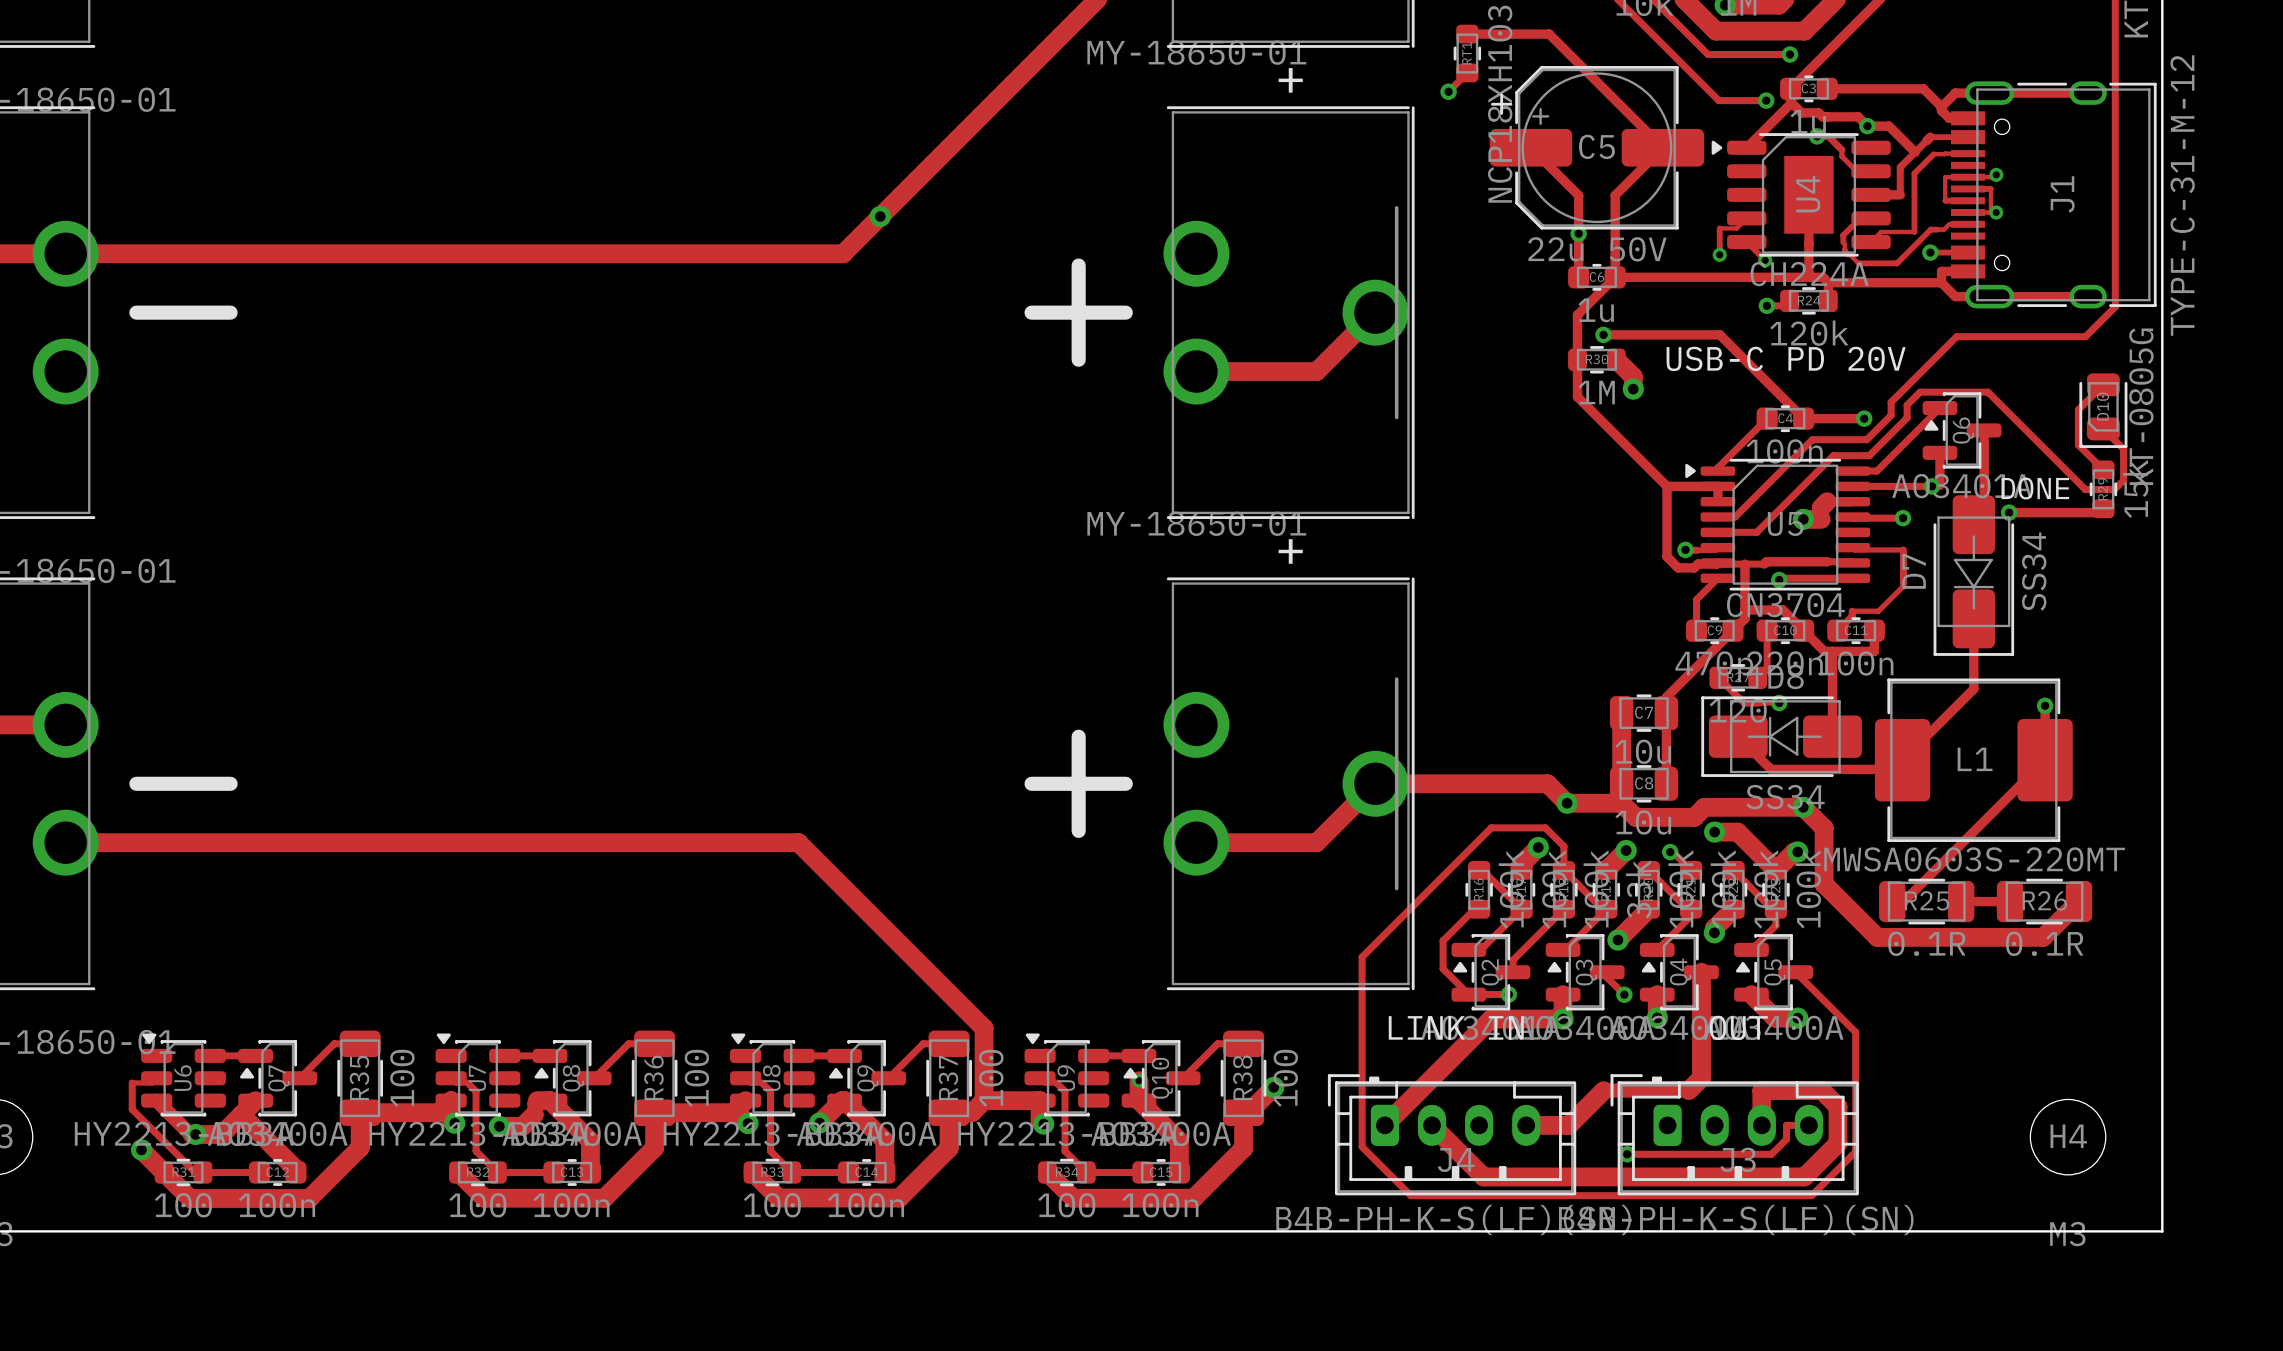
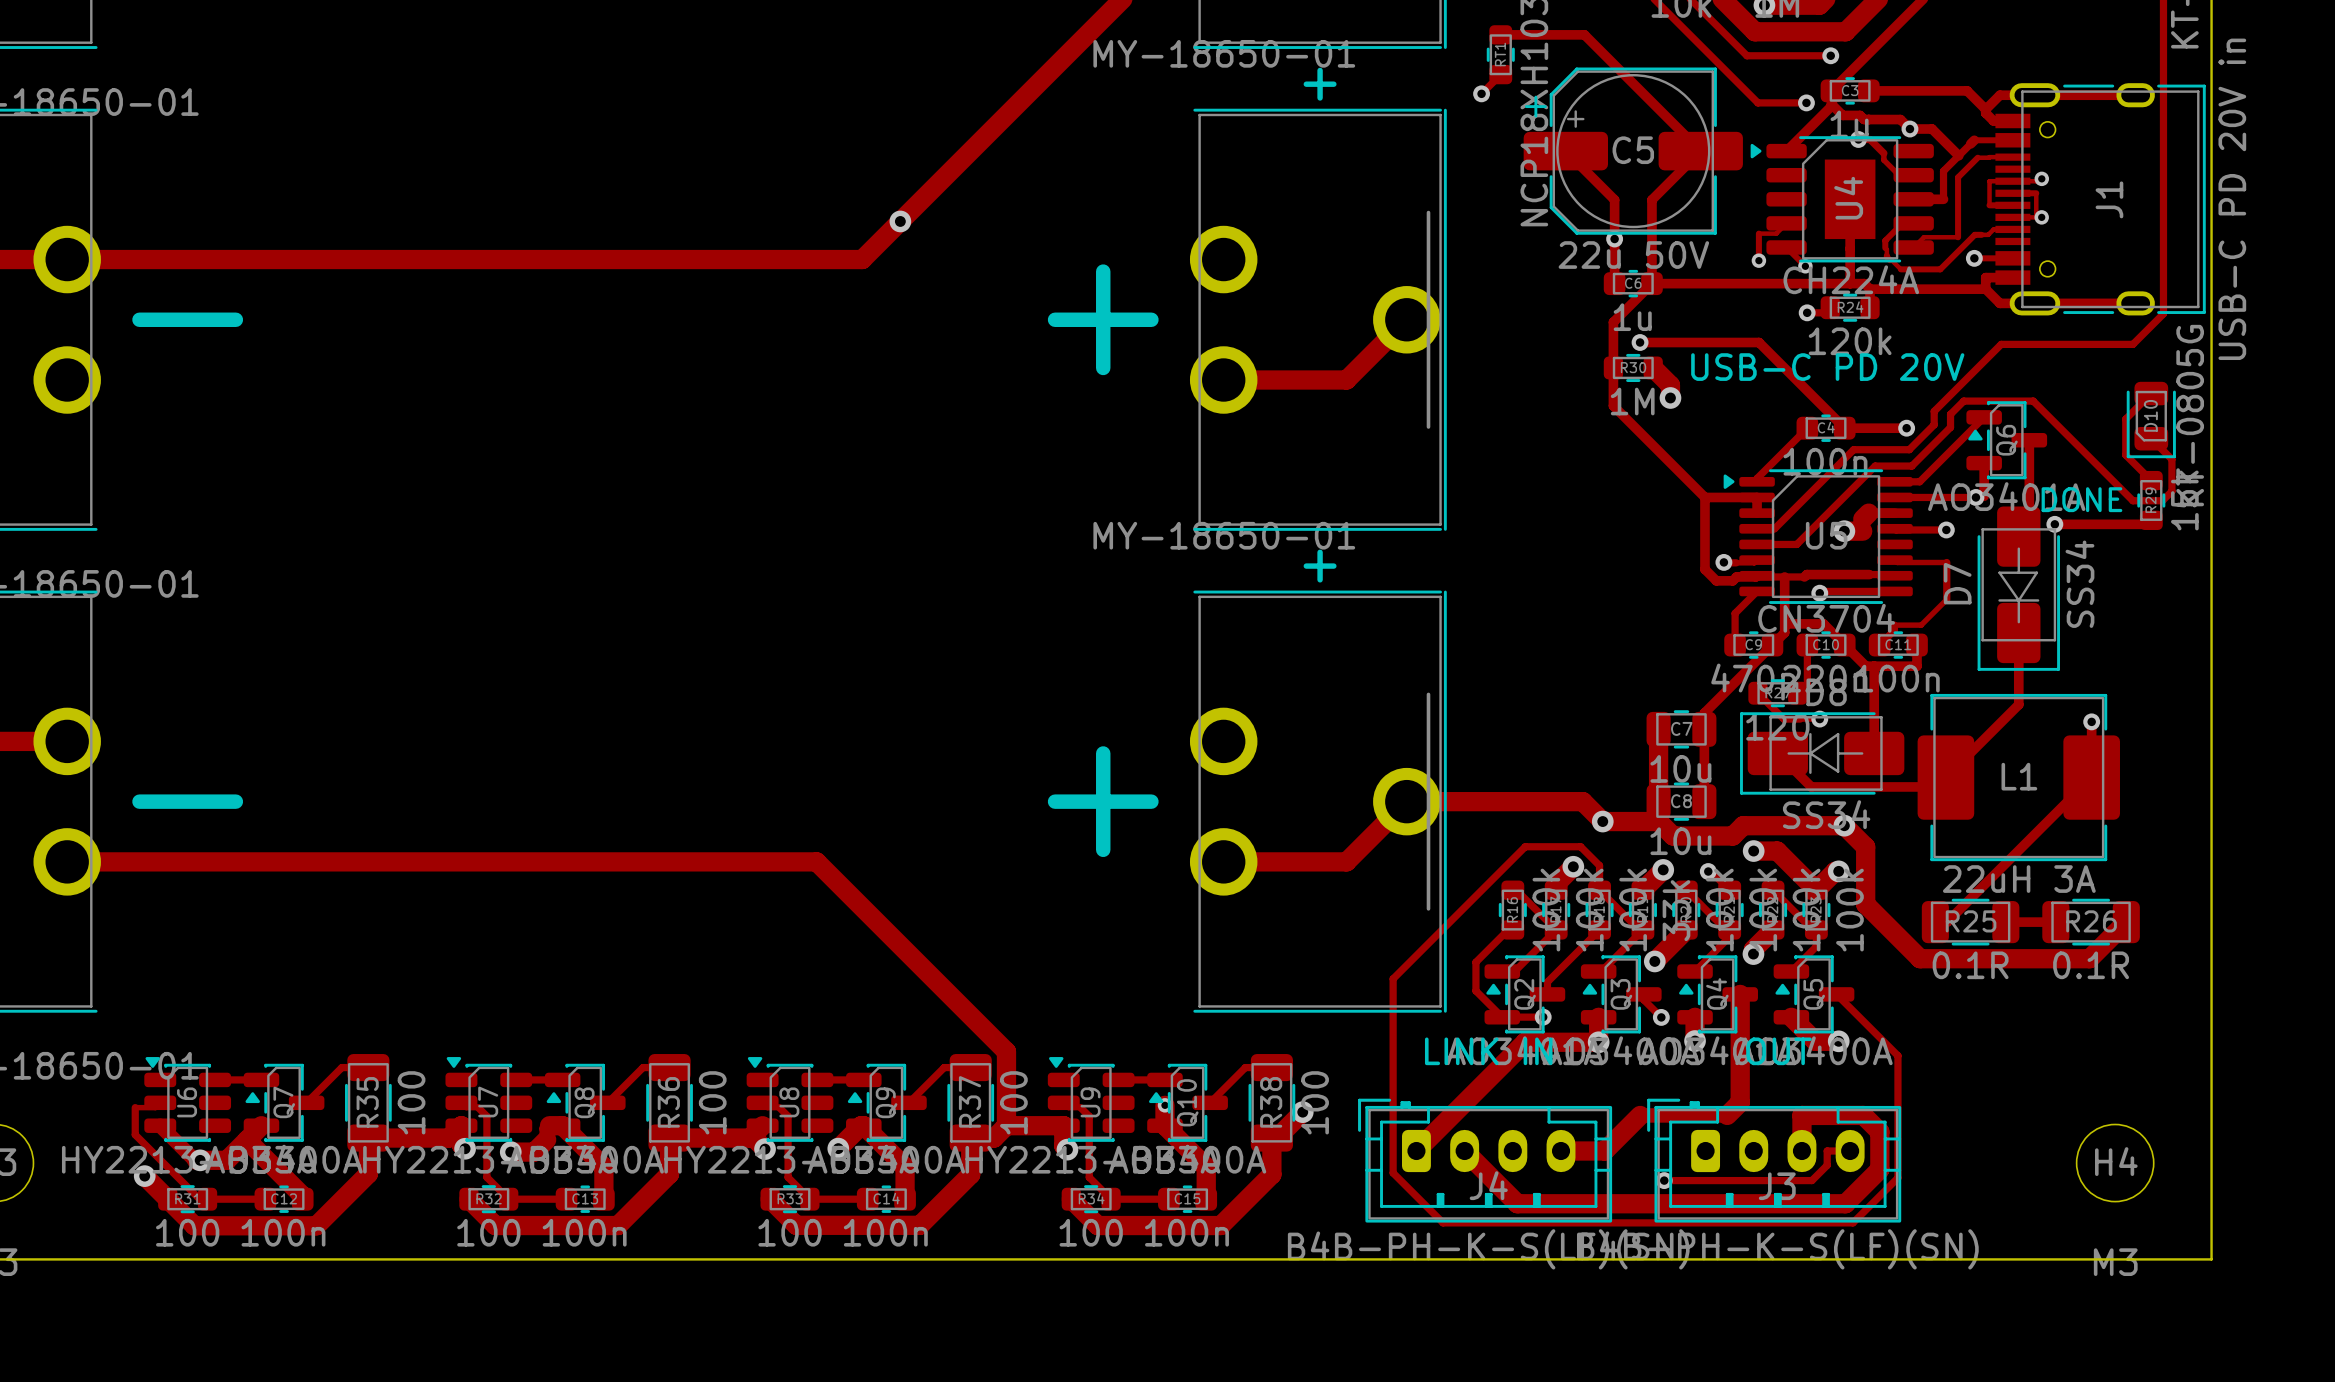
J1 value: TYPE-C-31-M-12 (2182, 195) -> USB-C PD 20V in (2232, 199)
L1 value: MWSA0603S-220MT (1974, 859) -> 22uH 3A (2019, 879)

